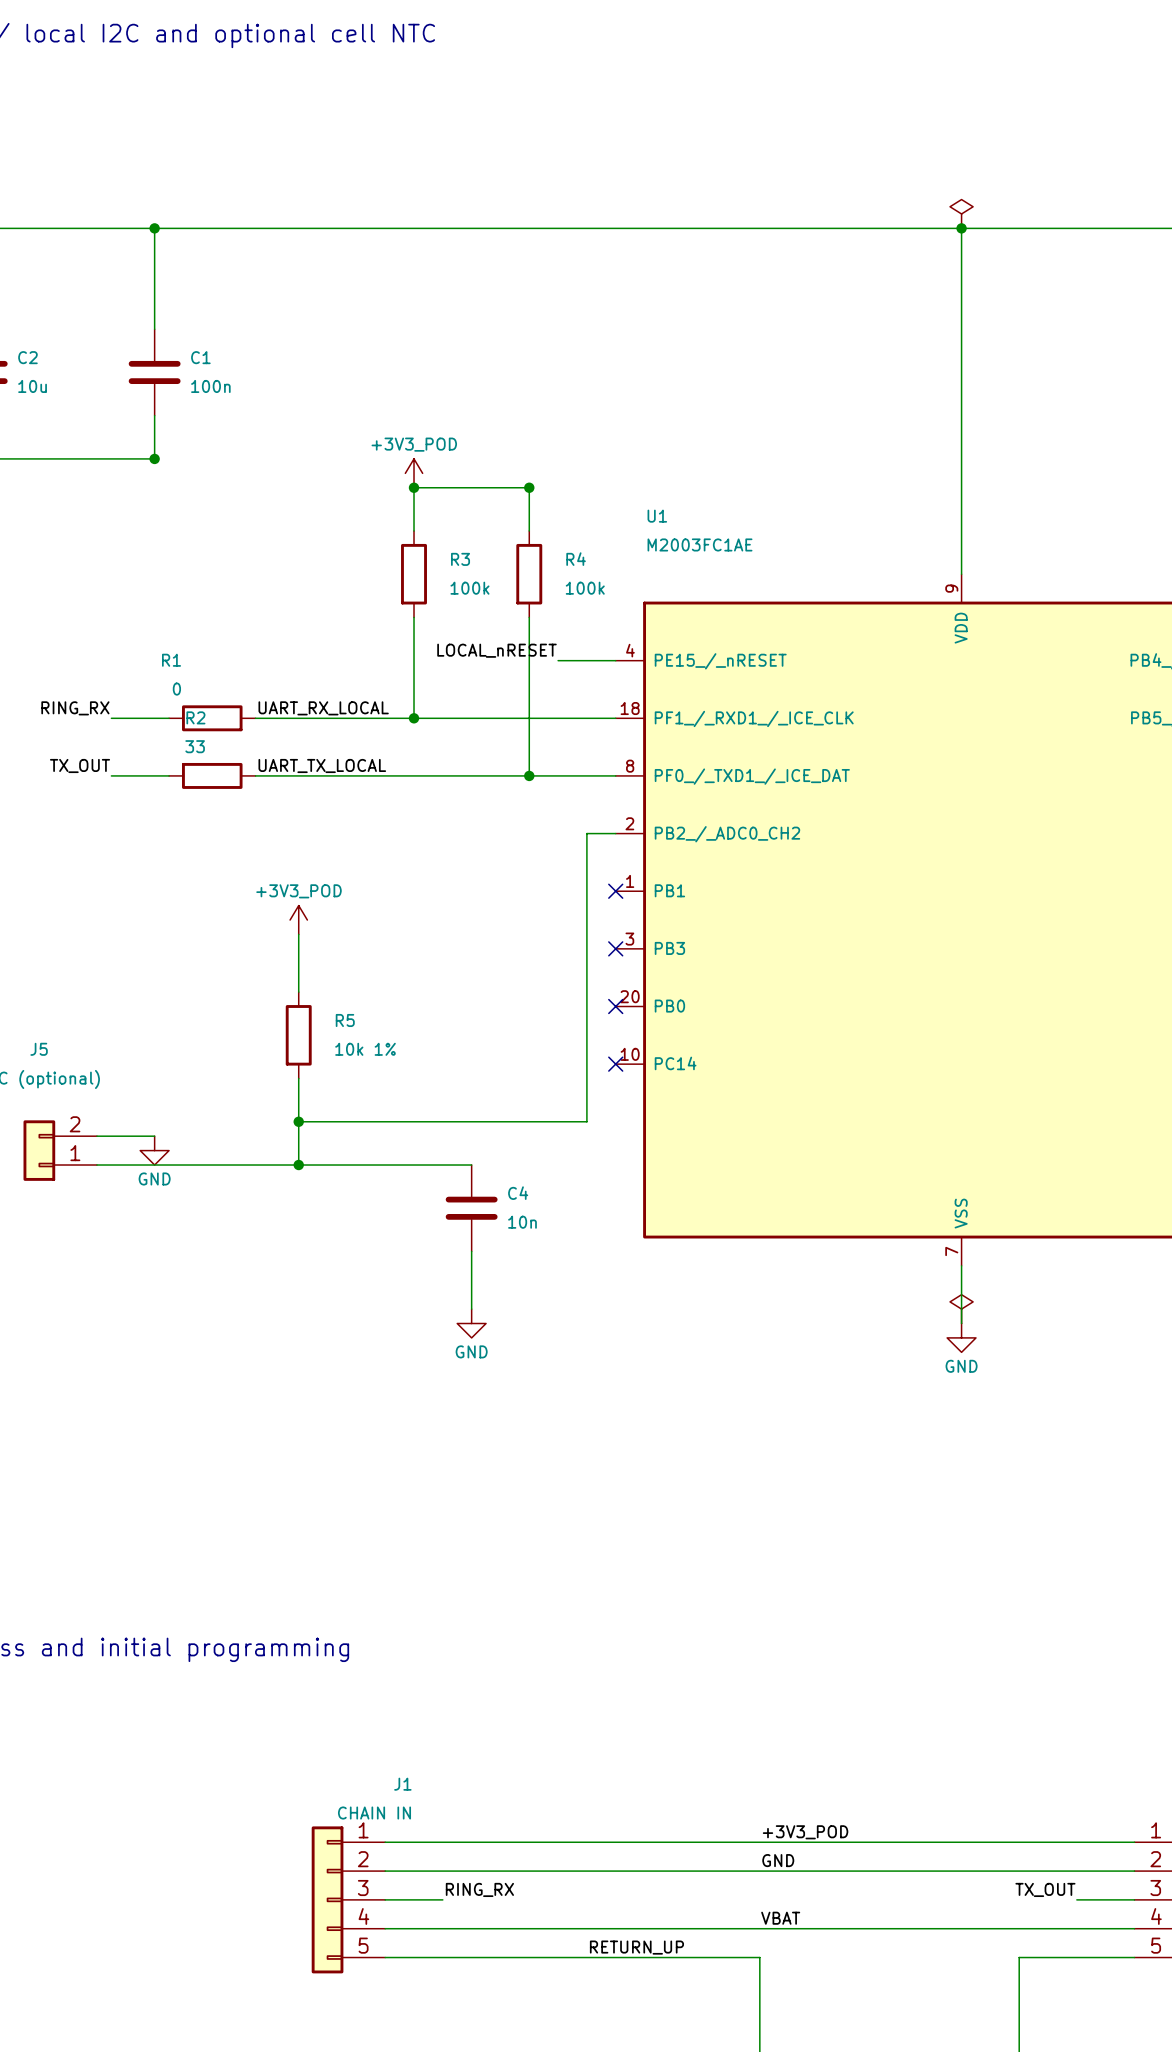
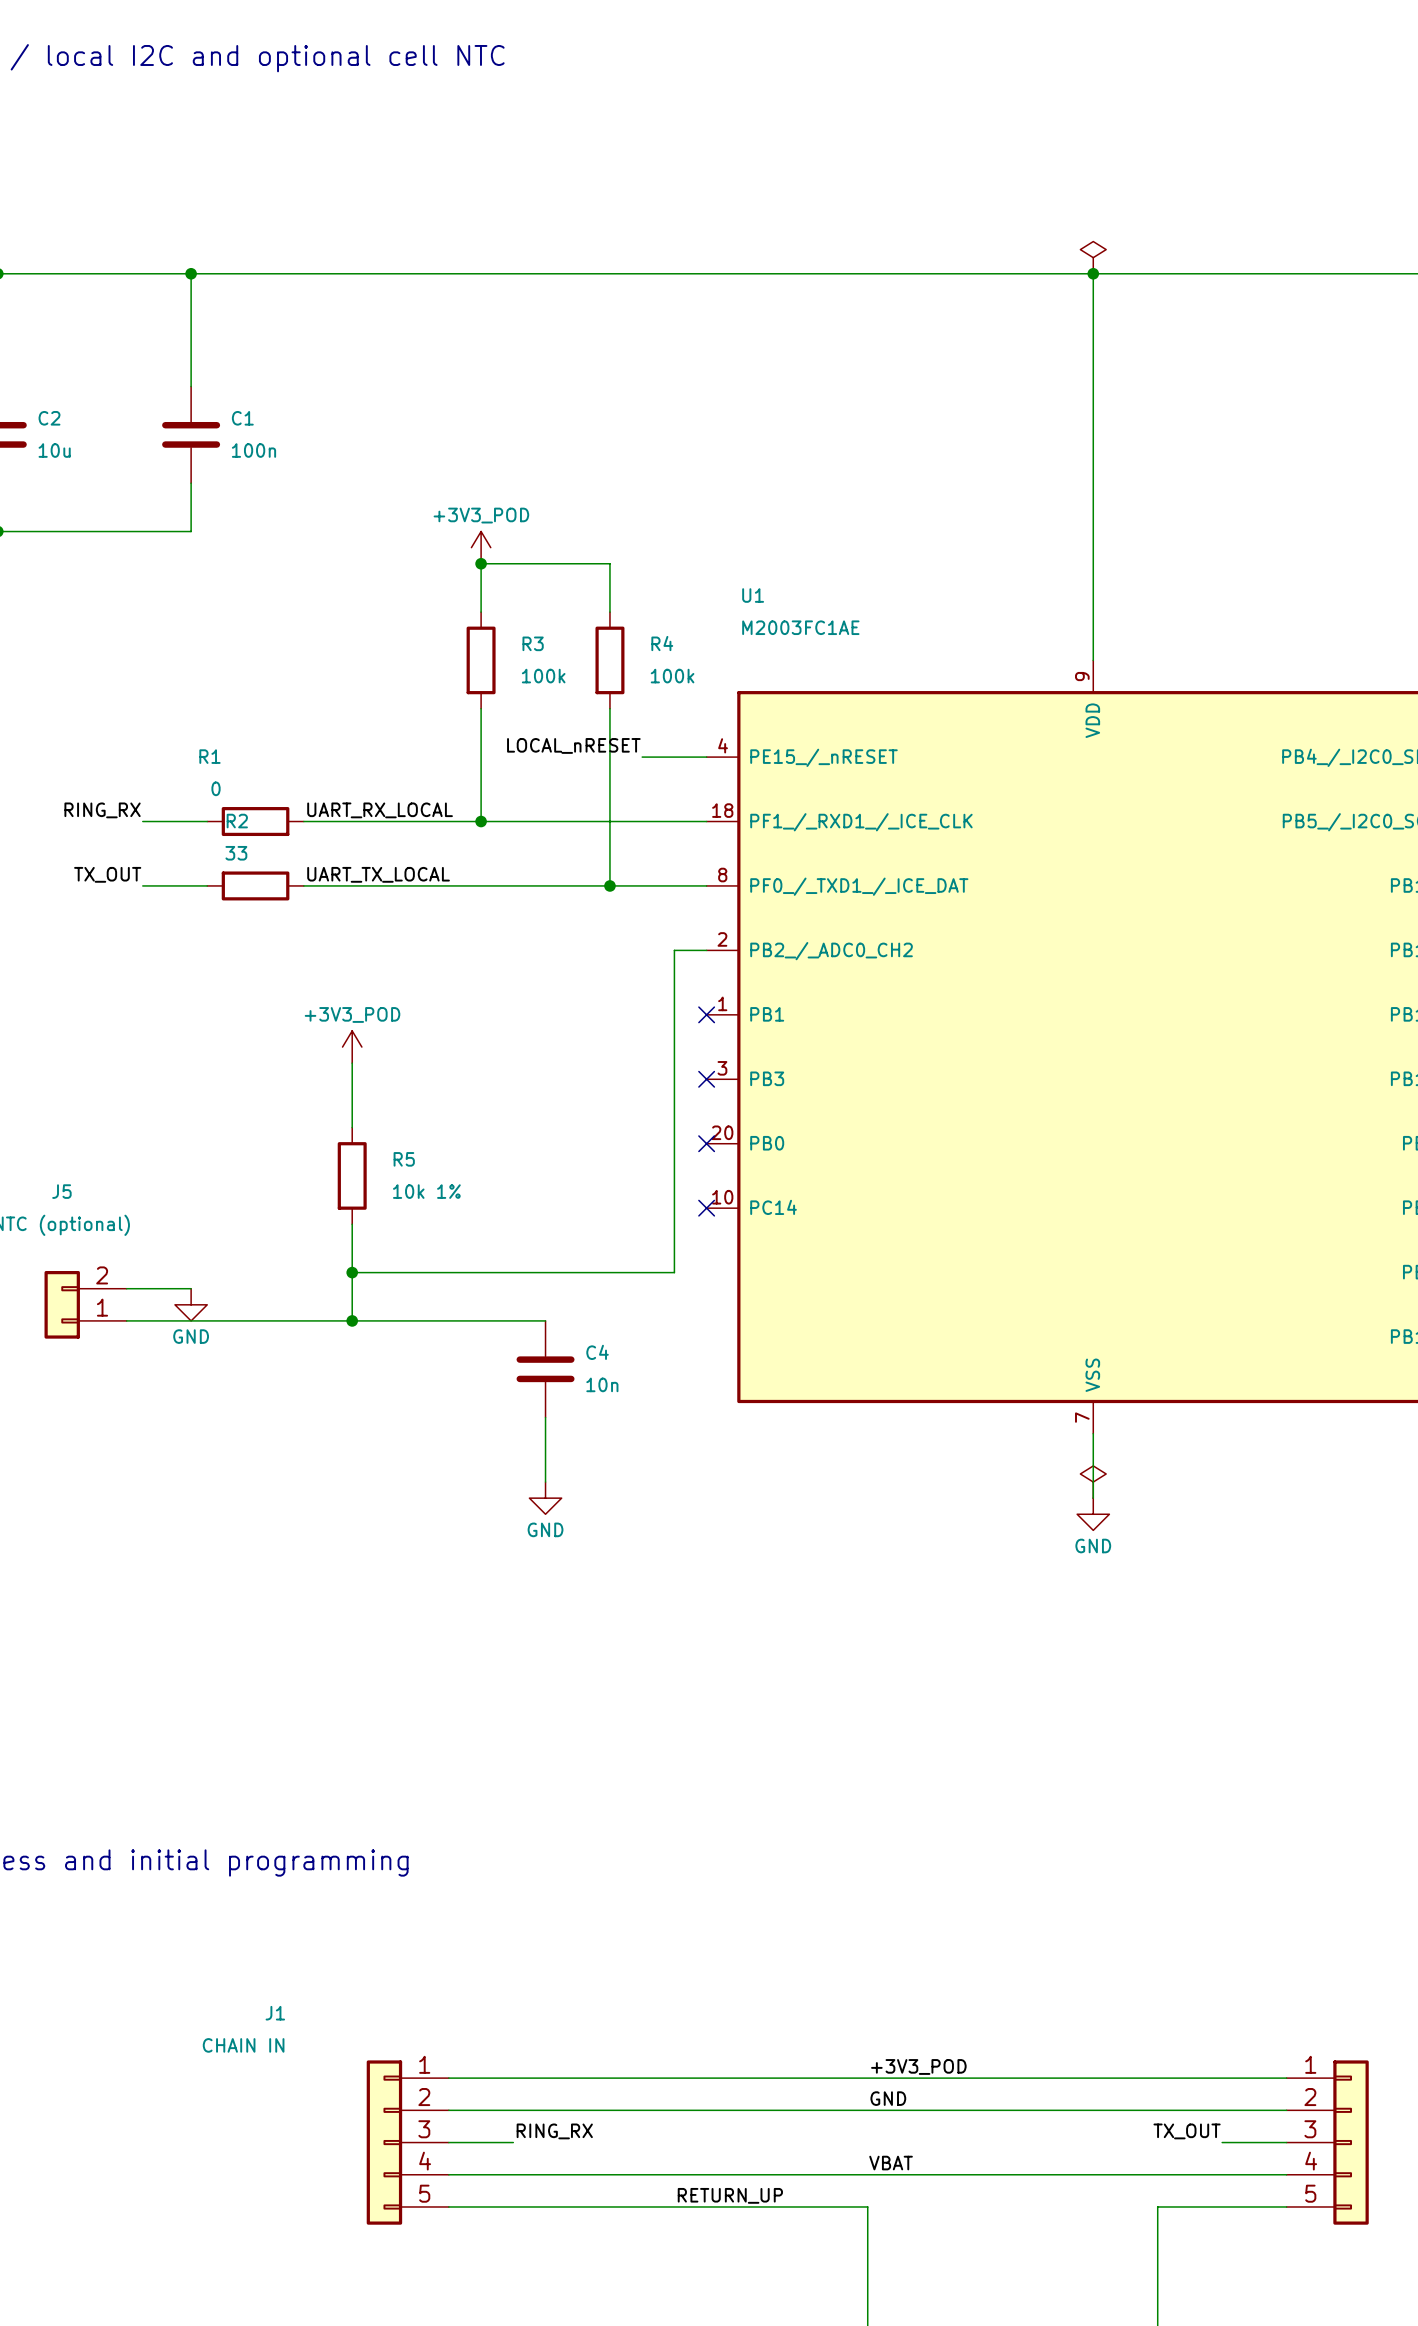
junction: (154, 458) -> none
junction: (529, 487) -> none
J1 name position: J1 (402, 1784) -> J1 (275, 2013)
J1 value position: CHAIN IN (374, 1813) -> CHAIN IN (243, 2045)

